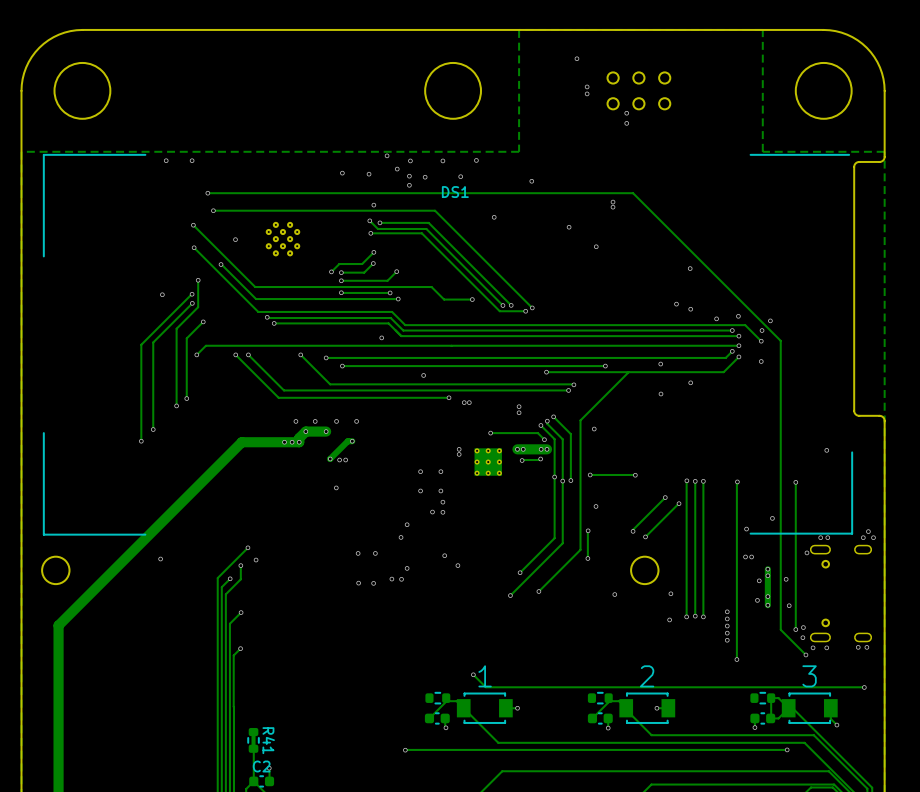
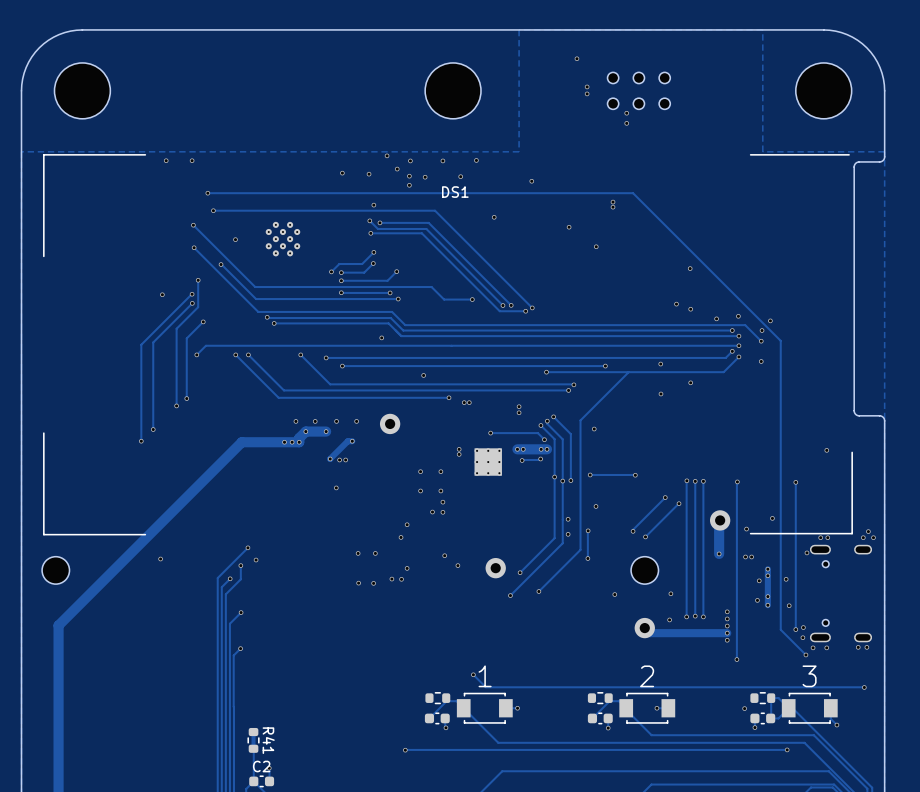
part: none -> (390, 423)
via: none -> (568, 519)
track: none -> (720, 520) (719, 553)
part: none -> (720, 520)
via: none -> (568, 534)
via: none -> (719, 553)
part: none -> (495, 568)
track: none -> (644, 628) (649, 633) (727, 633)
part: none -> (644, 628)
via: none -> (744, 708)

